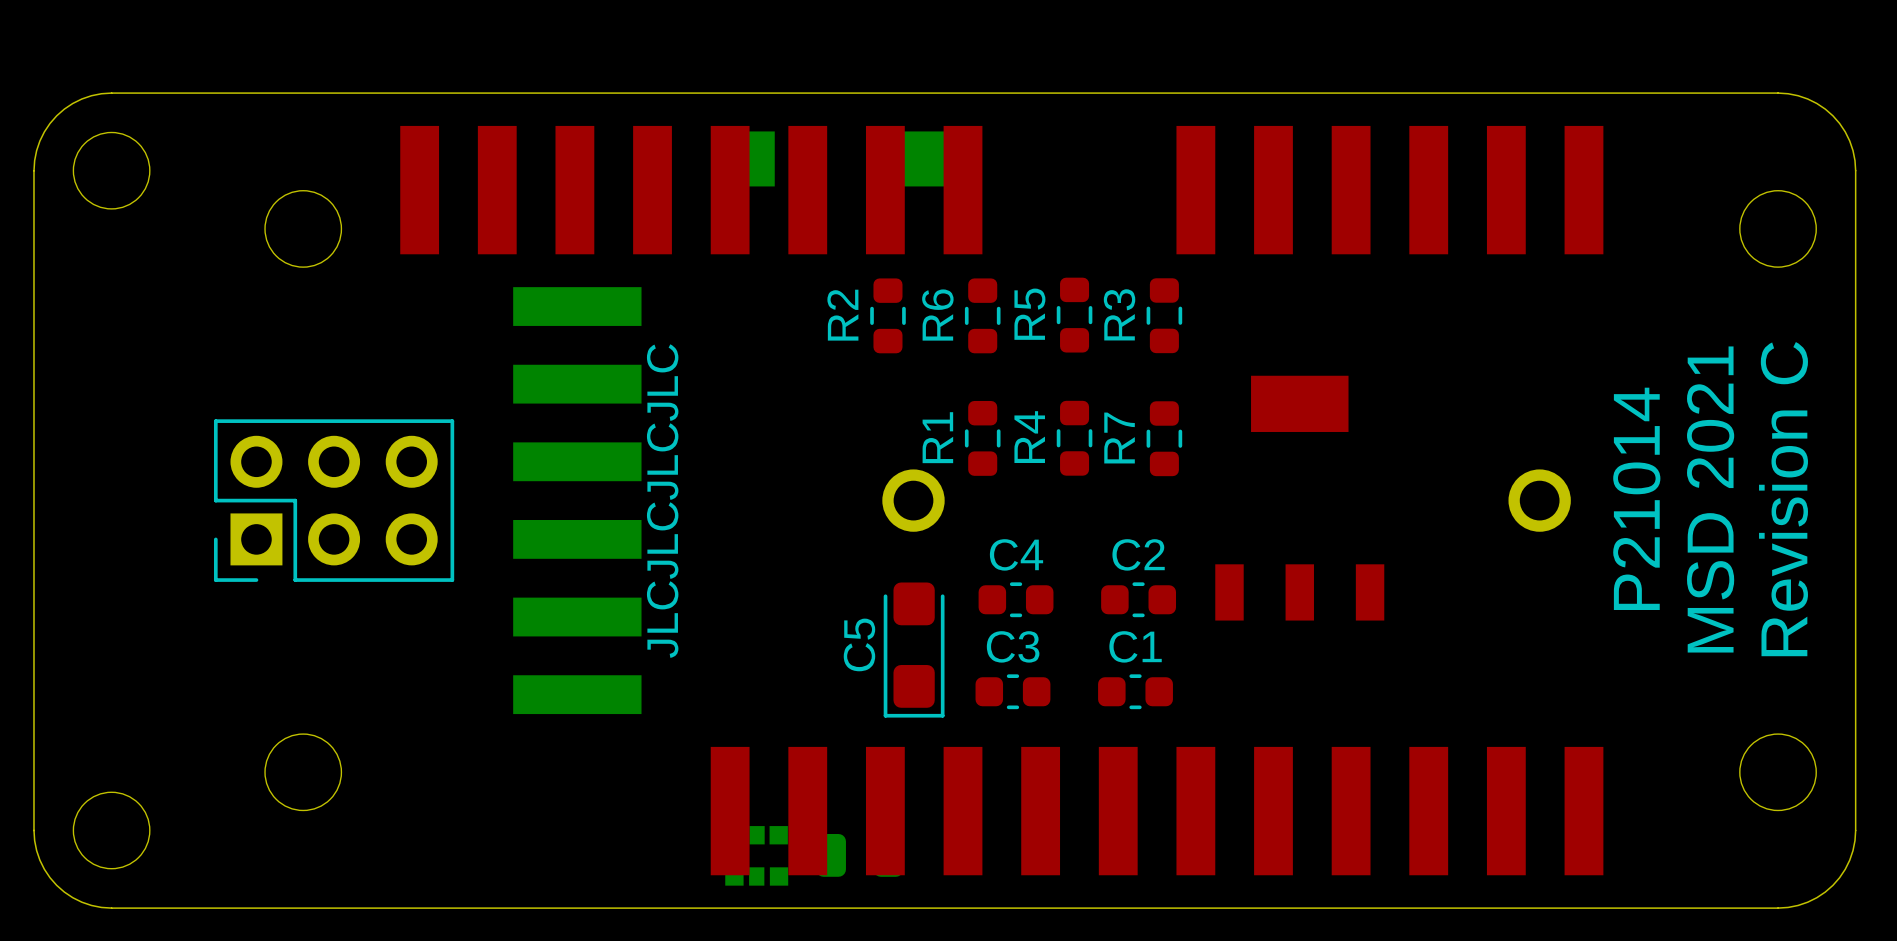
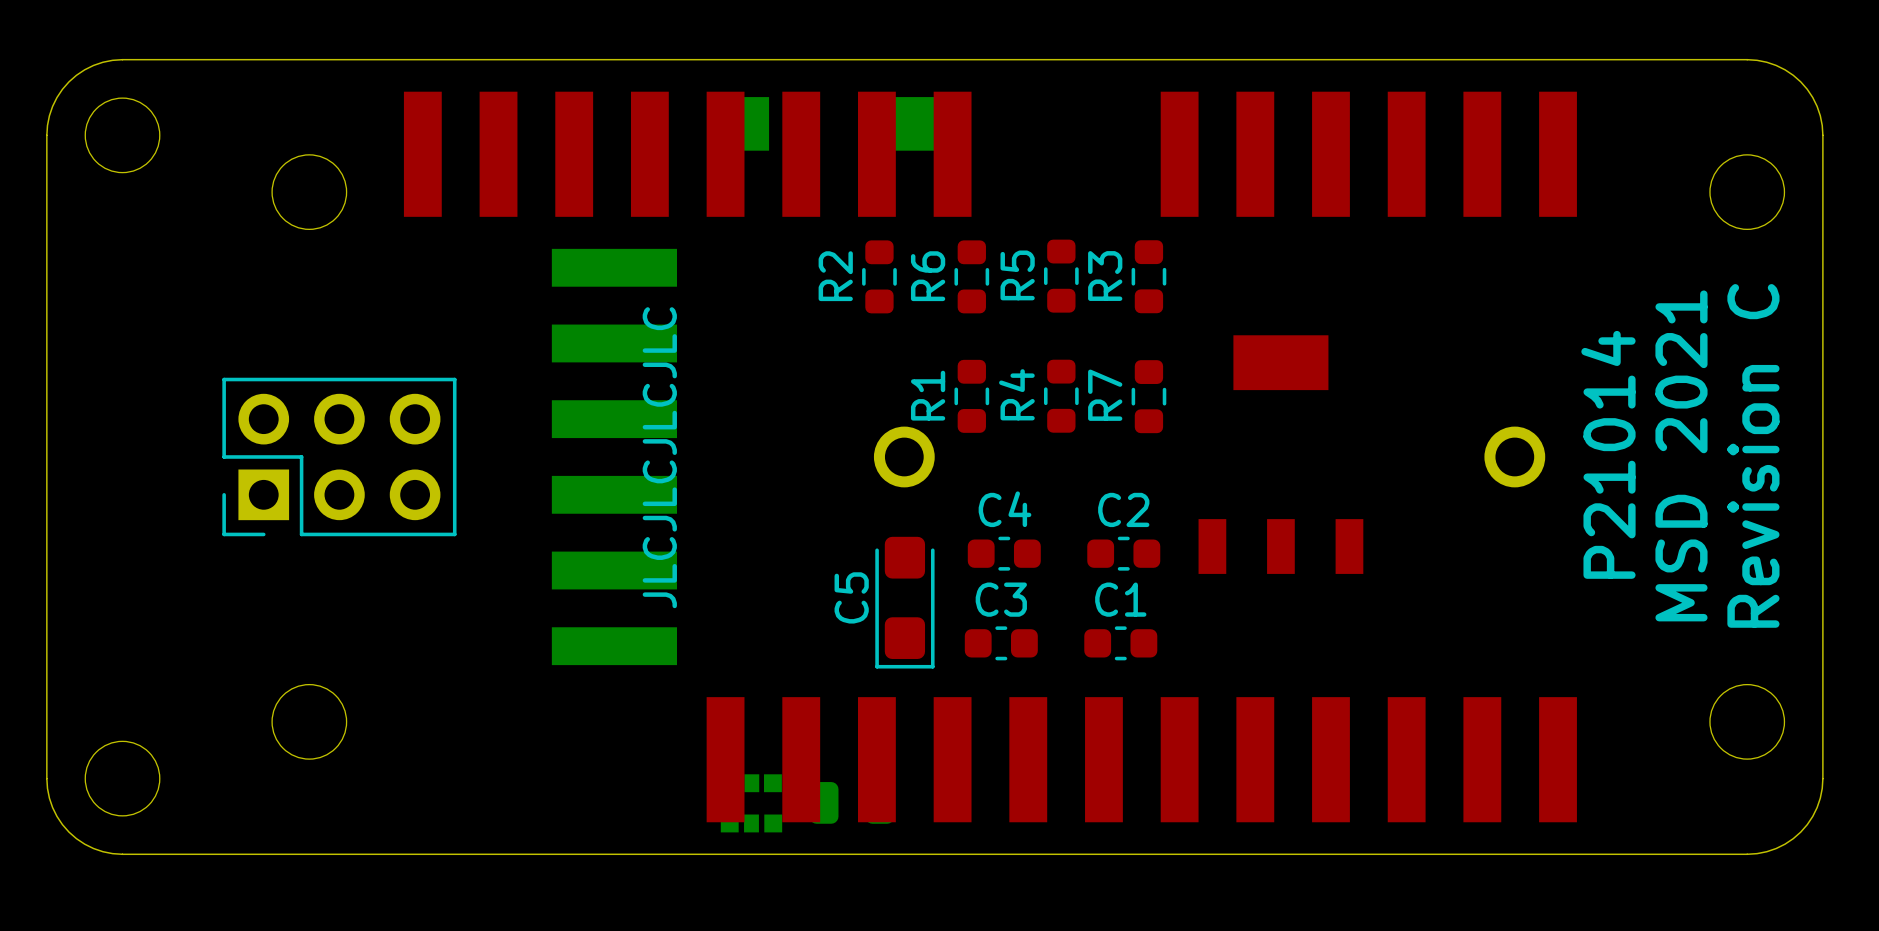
part position: (577, 500) -> (614, 456)

